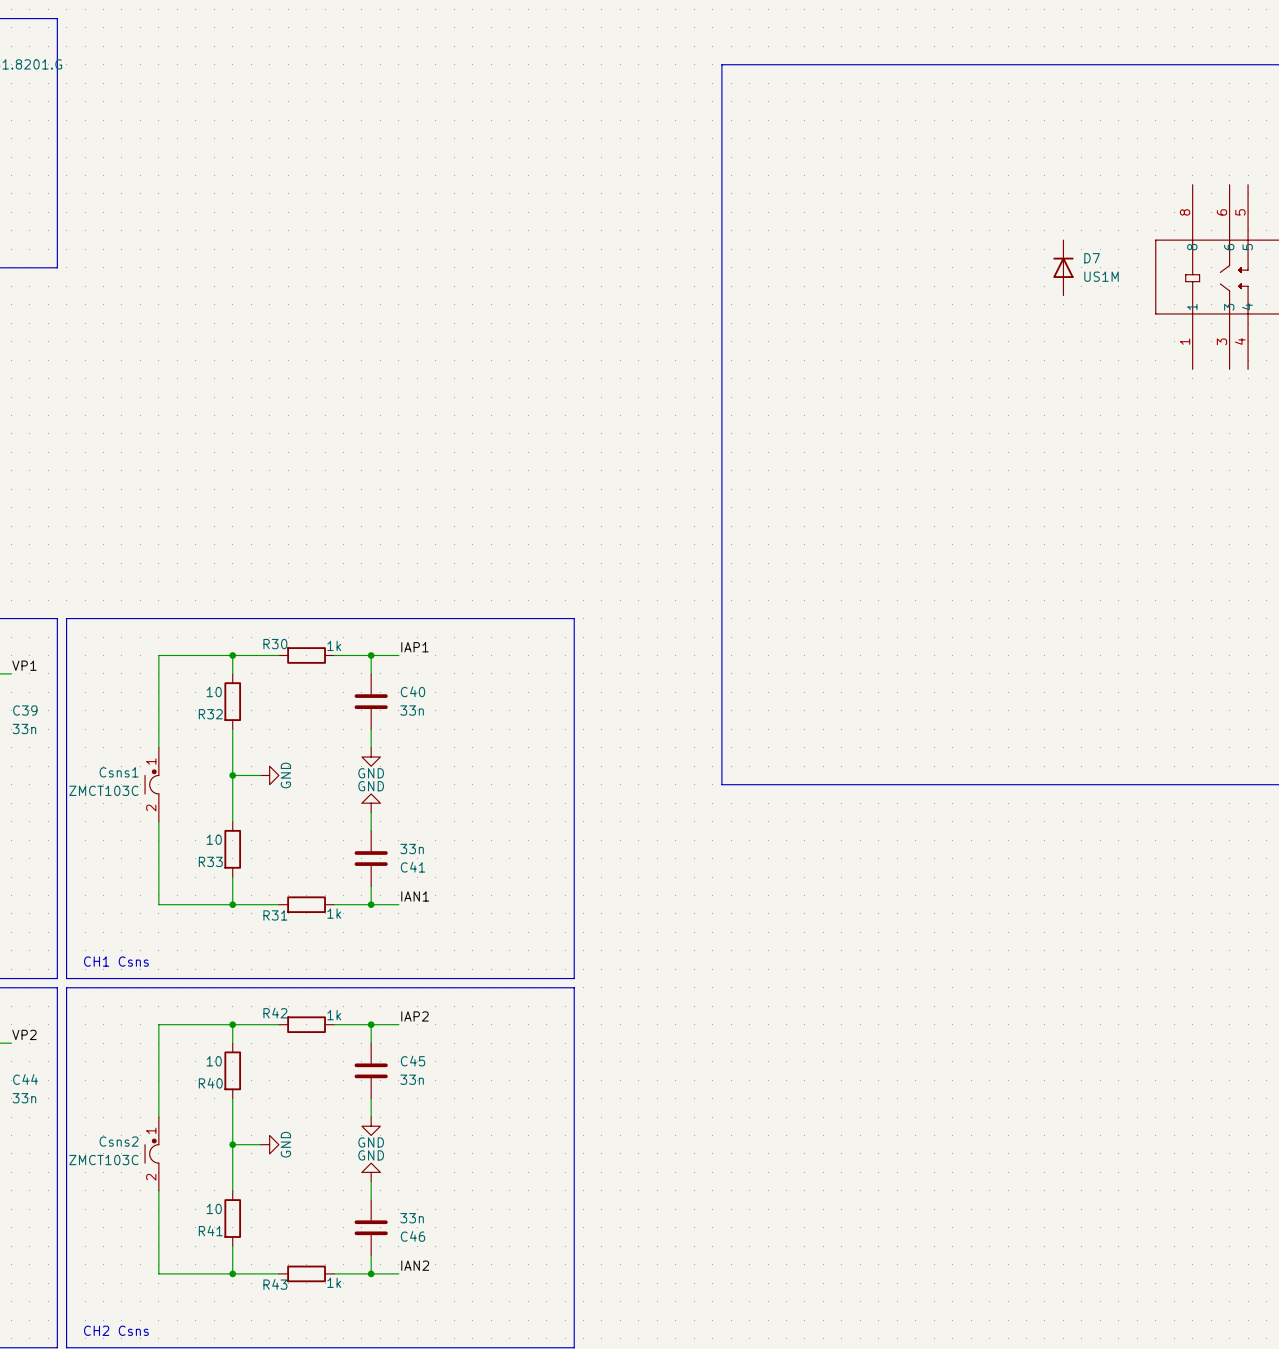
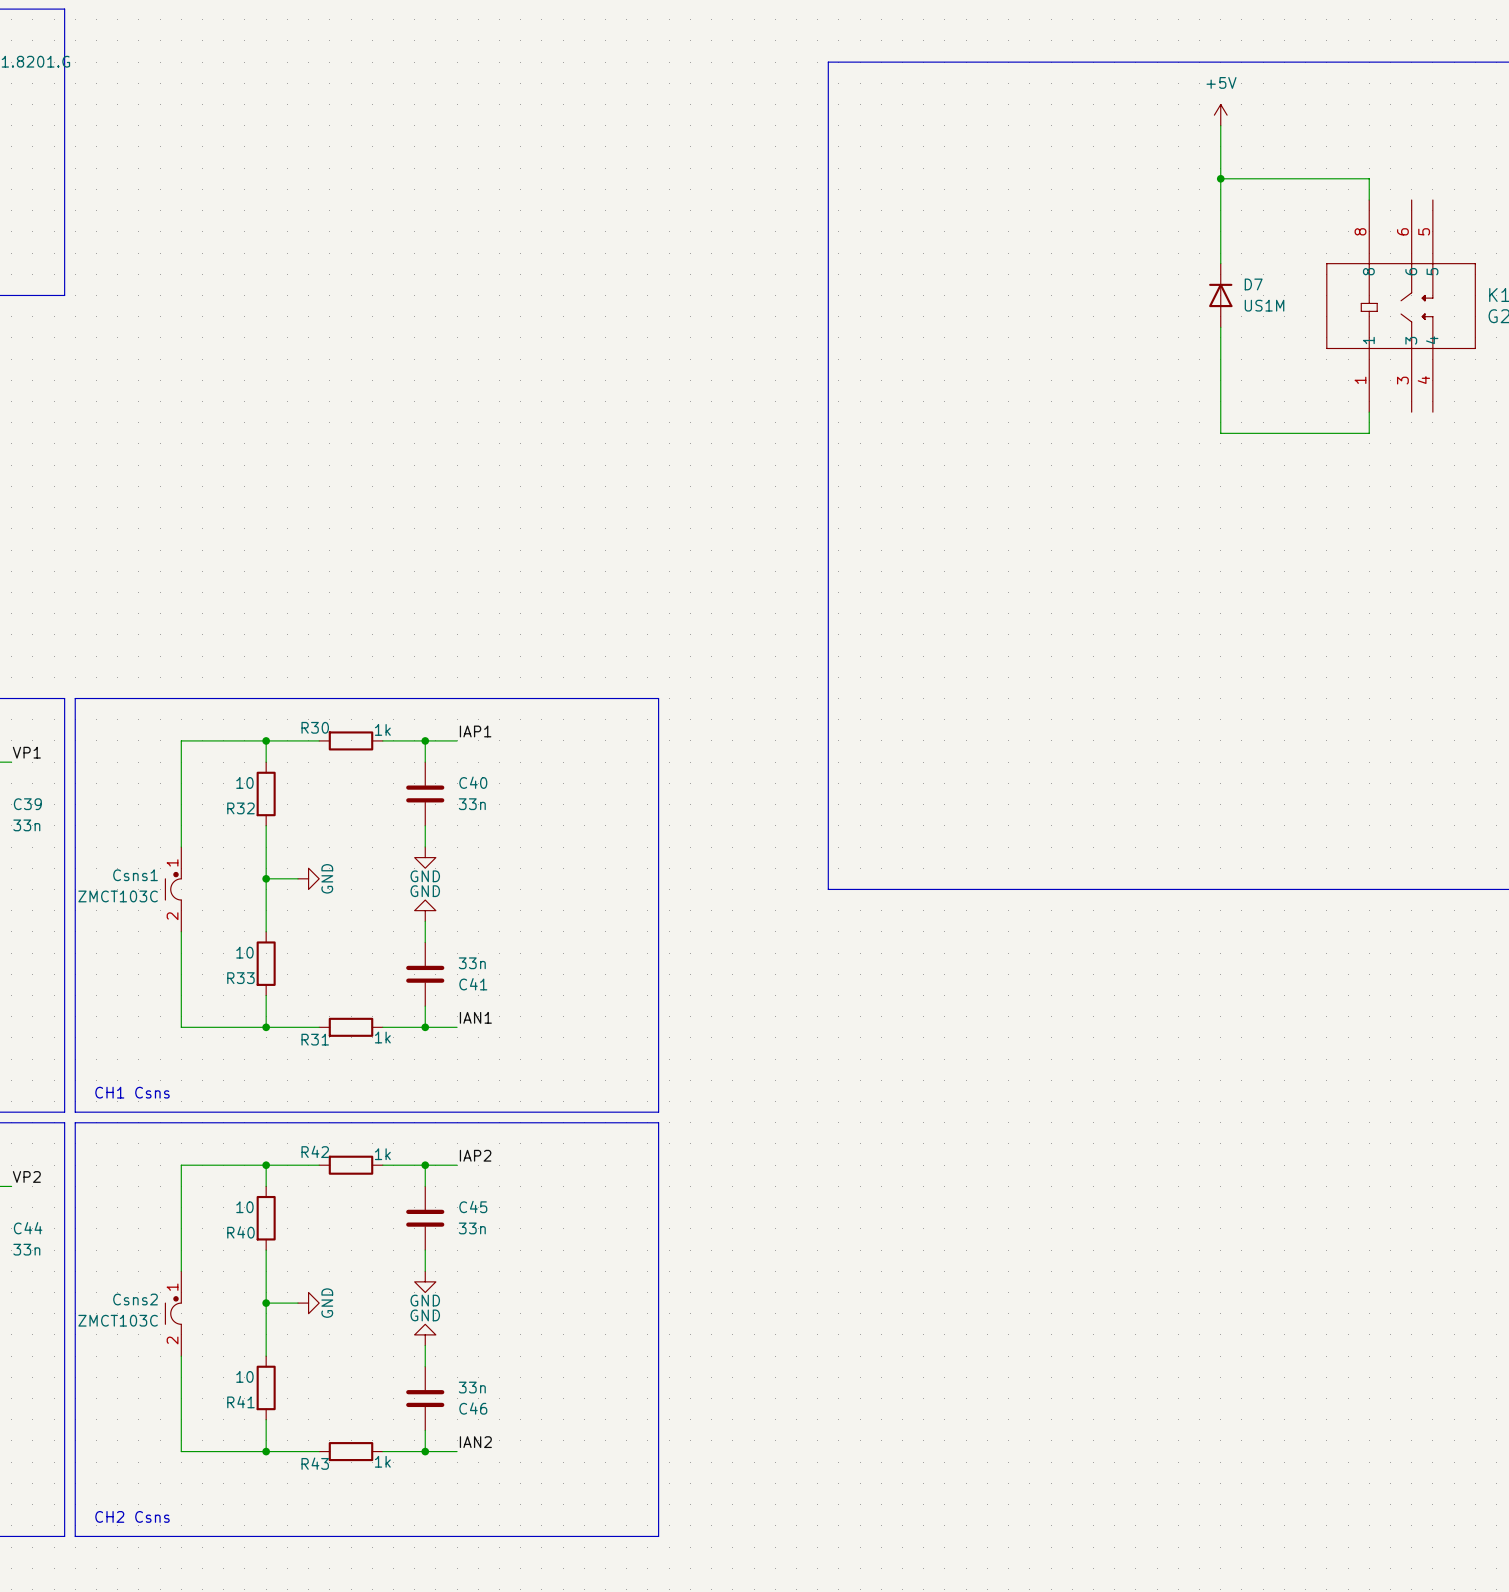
power symbol: none -> +5V (1220, 115)
wire: none -> (1220, 125) (1220, 263)
wire: none -> (1220, 178) (1369, 178) (1369, 200)
junction: none -> (1220, 178)
wire: none -> (1220, 327) (1220, 433) (1369, 433) (1369, 412)

